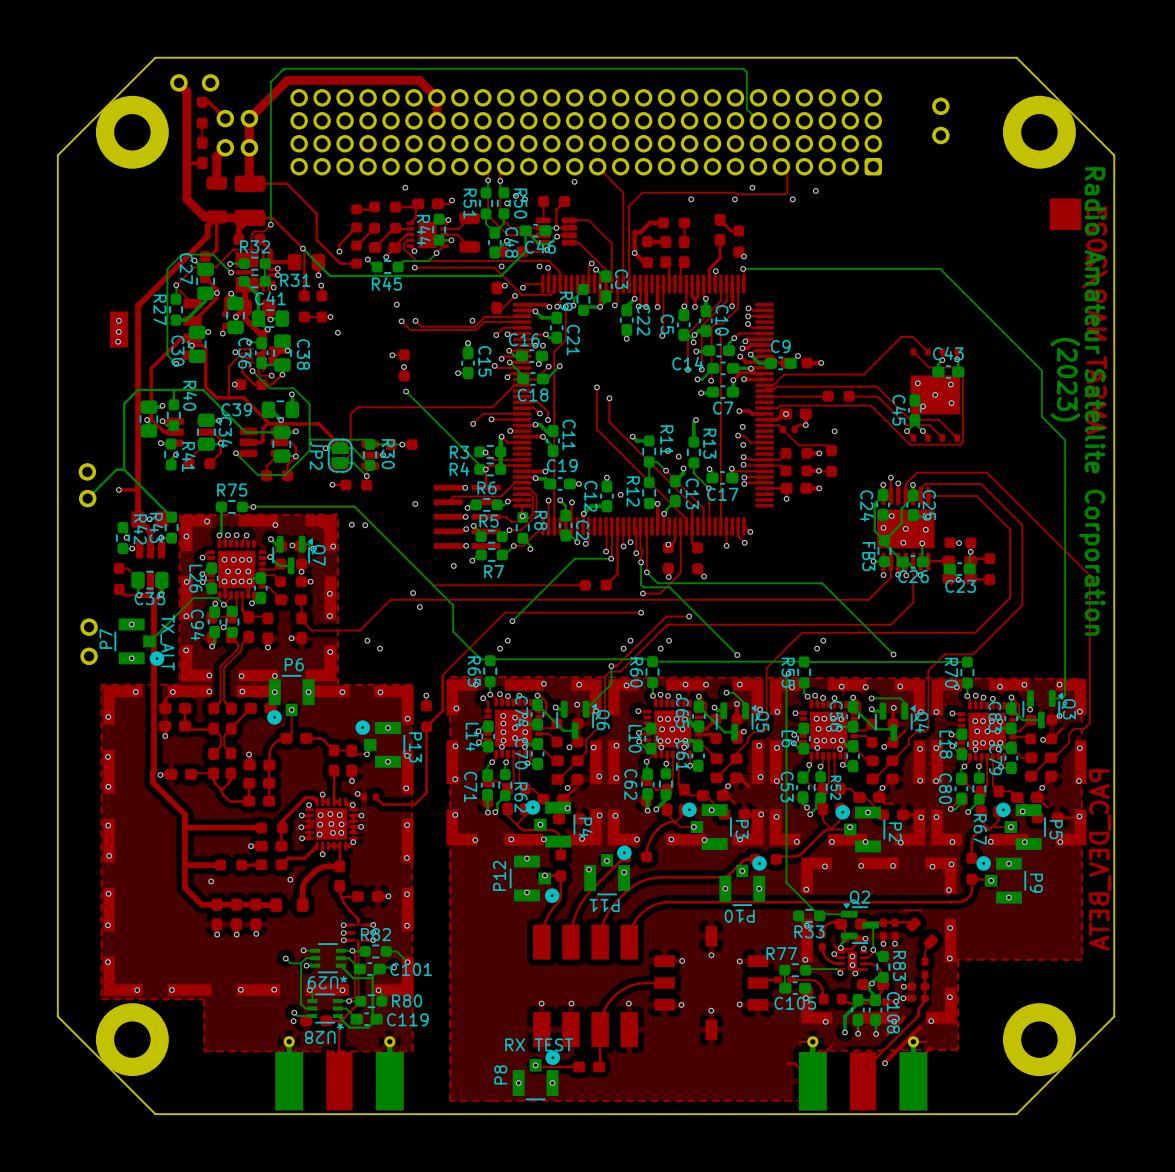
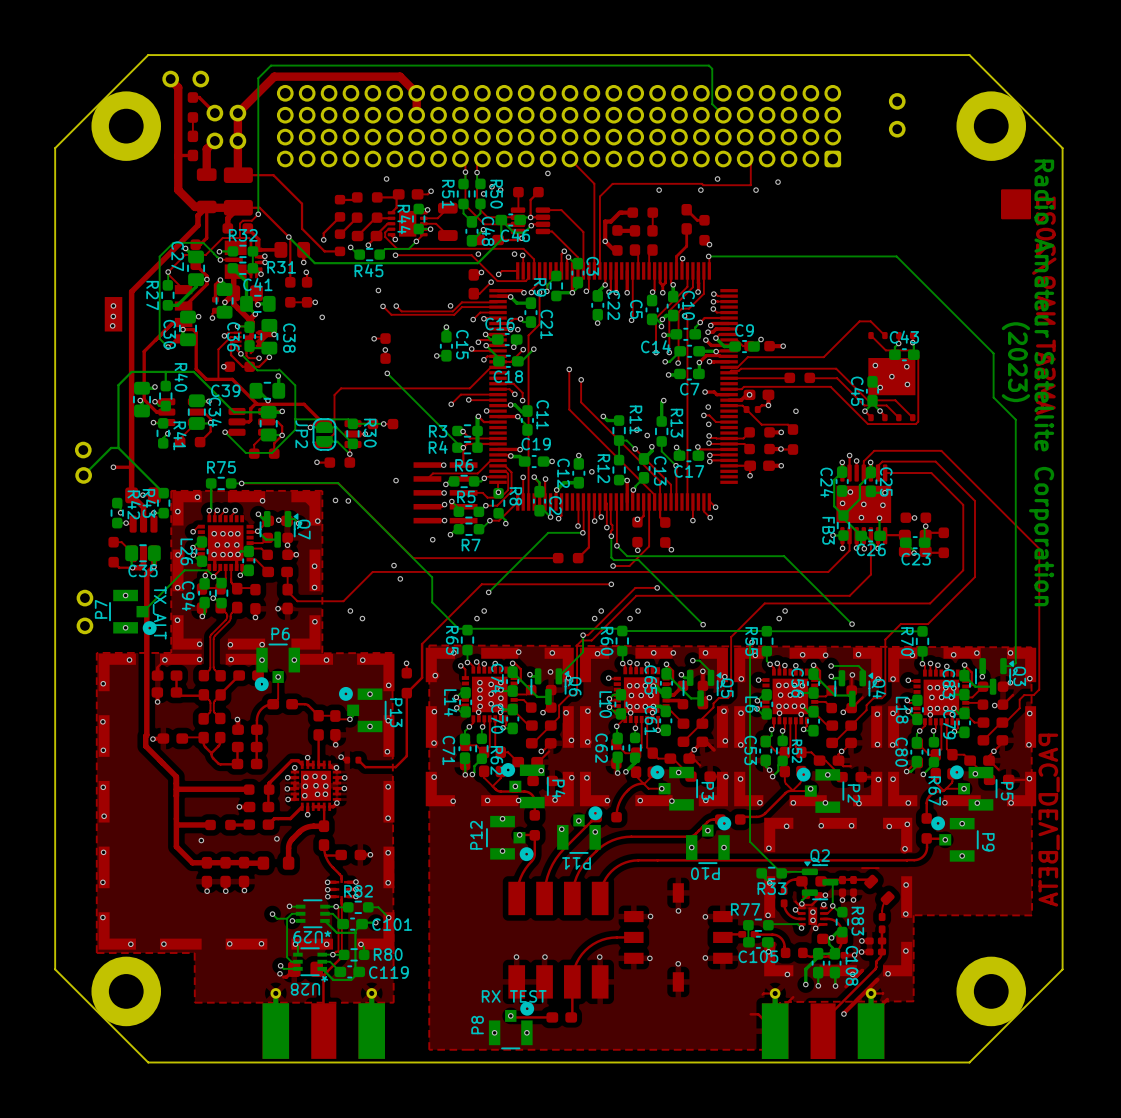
part footprint: [300, 1015, 333, 1027] -> [287, 961, 324, 977]
top track: none -> (294, 969) (286, 977) (283, 977)
top track: (326, 1020) (340, 1021) -> none

